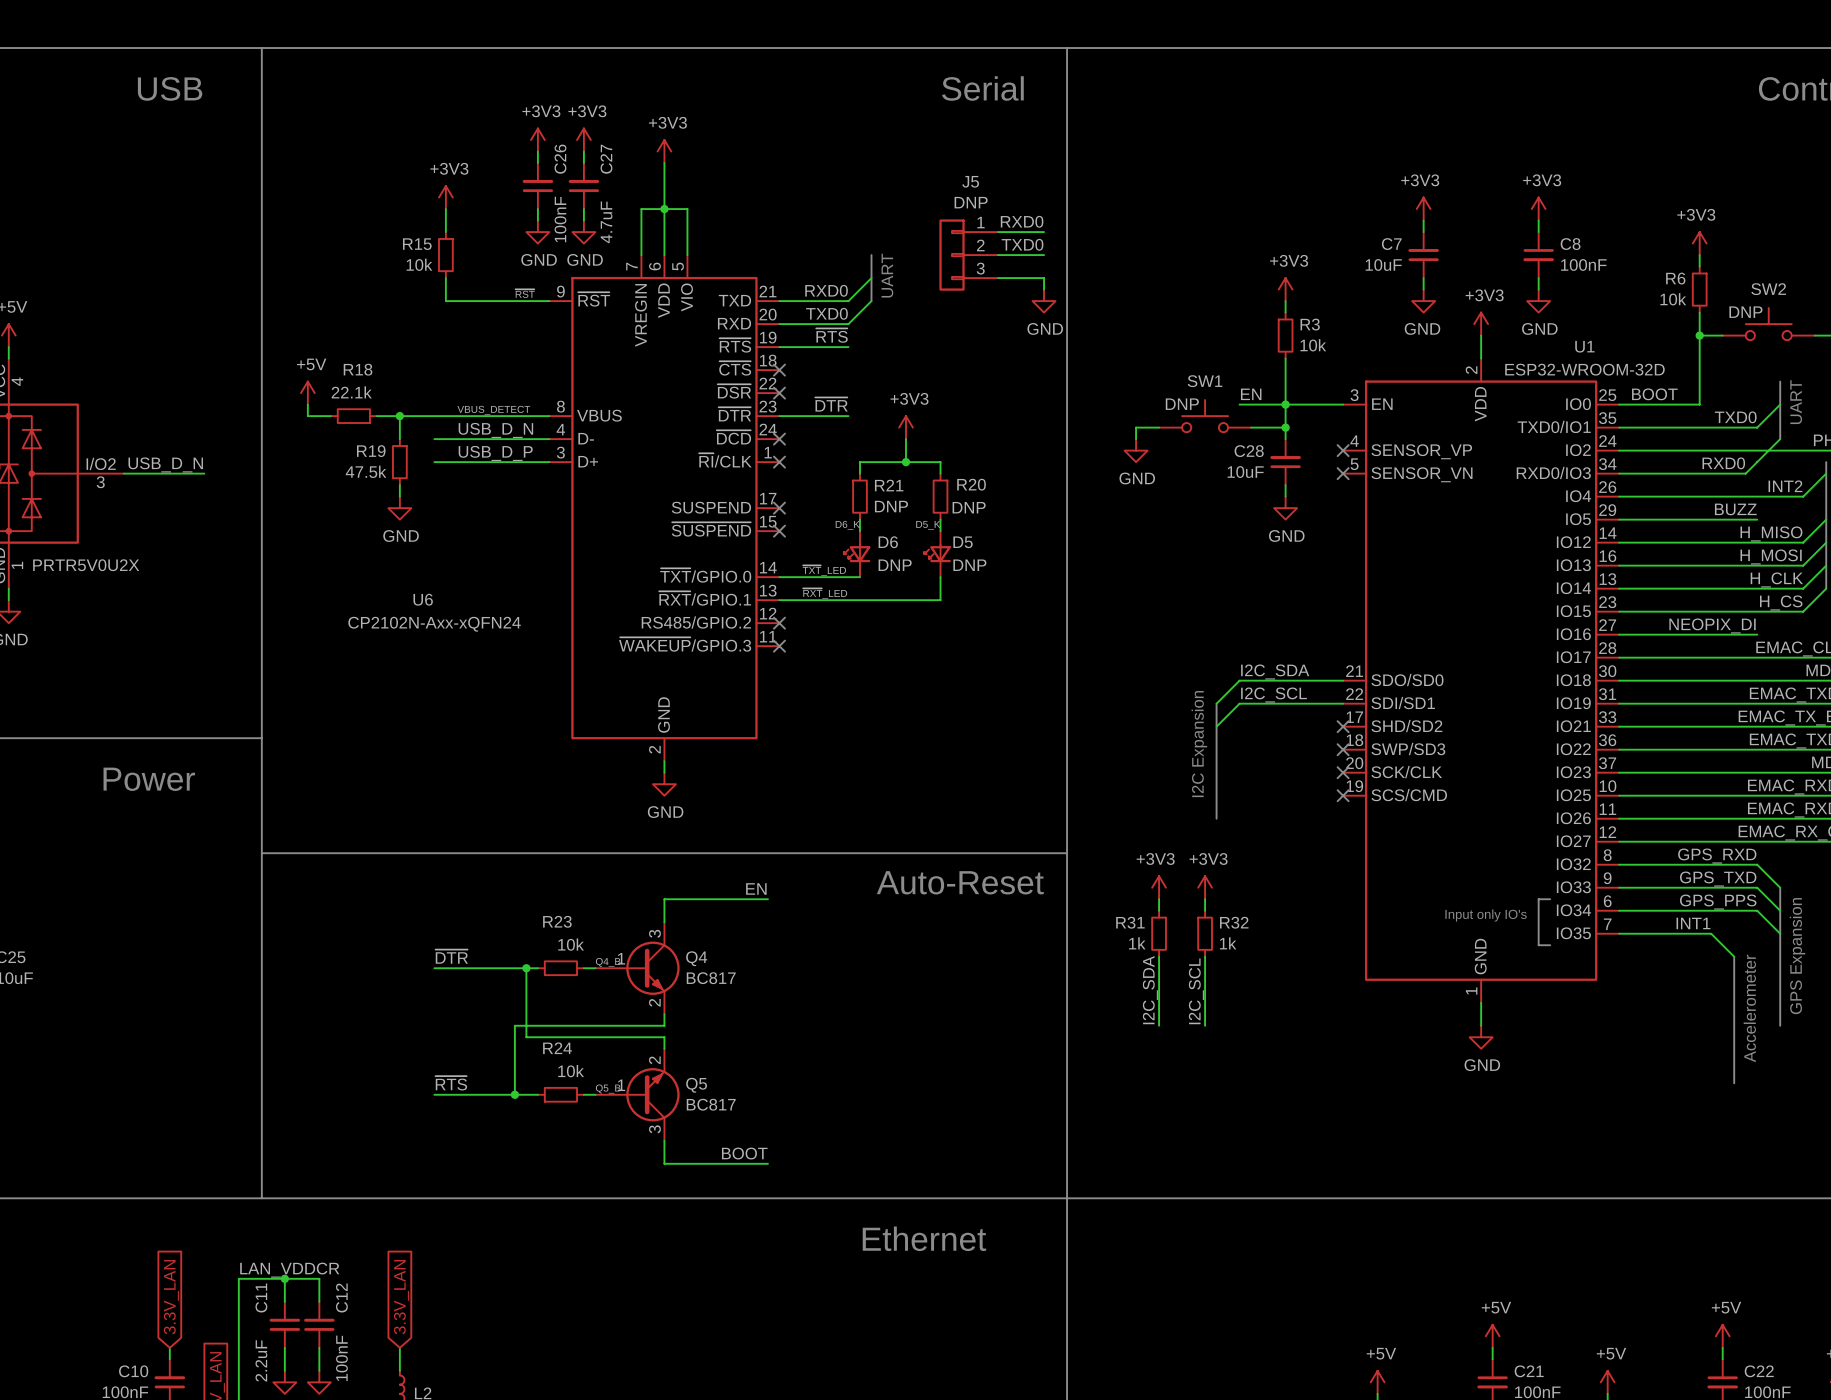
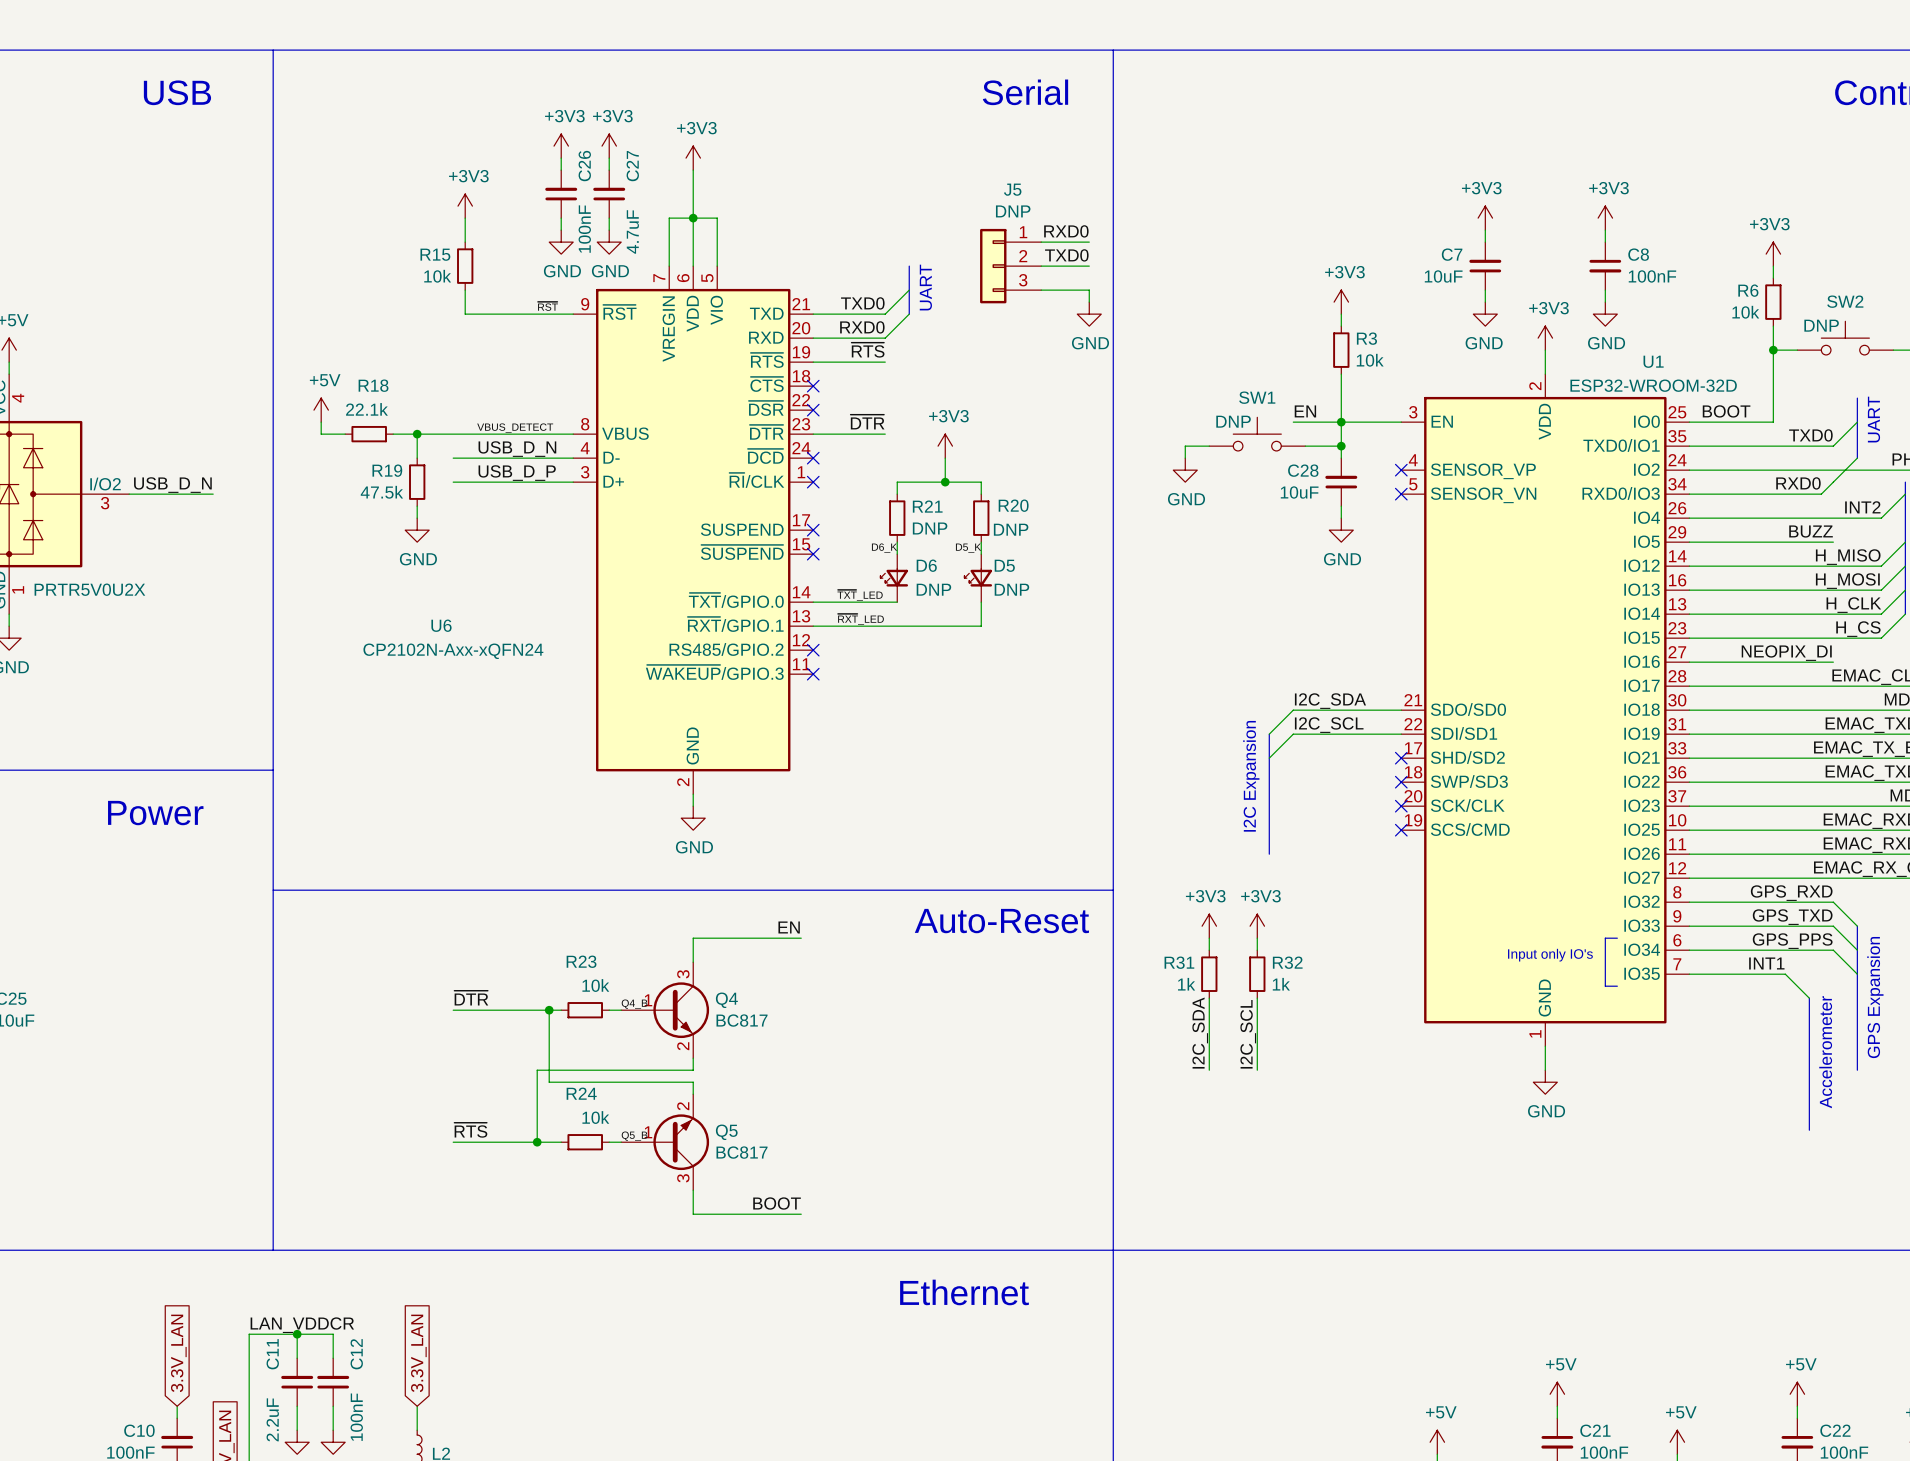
label: RXD0 (826, 290) -> TXD0 (862, 303)
label: TXD0 (826, 313) -> RXD0 (862, 327)

